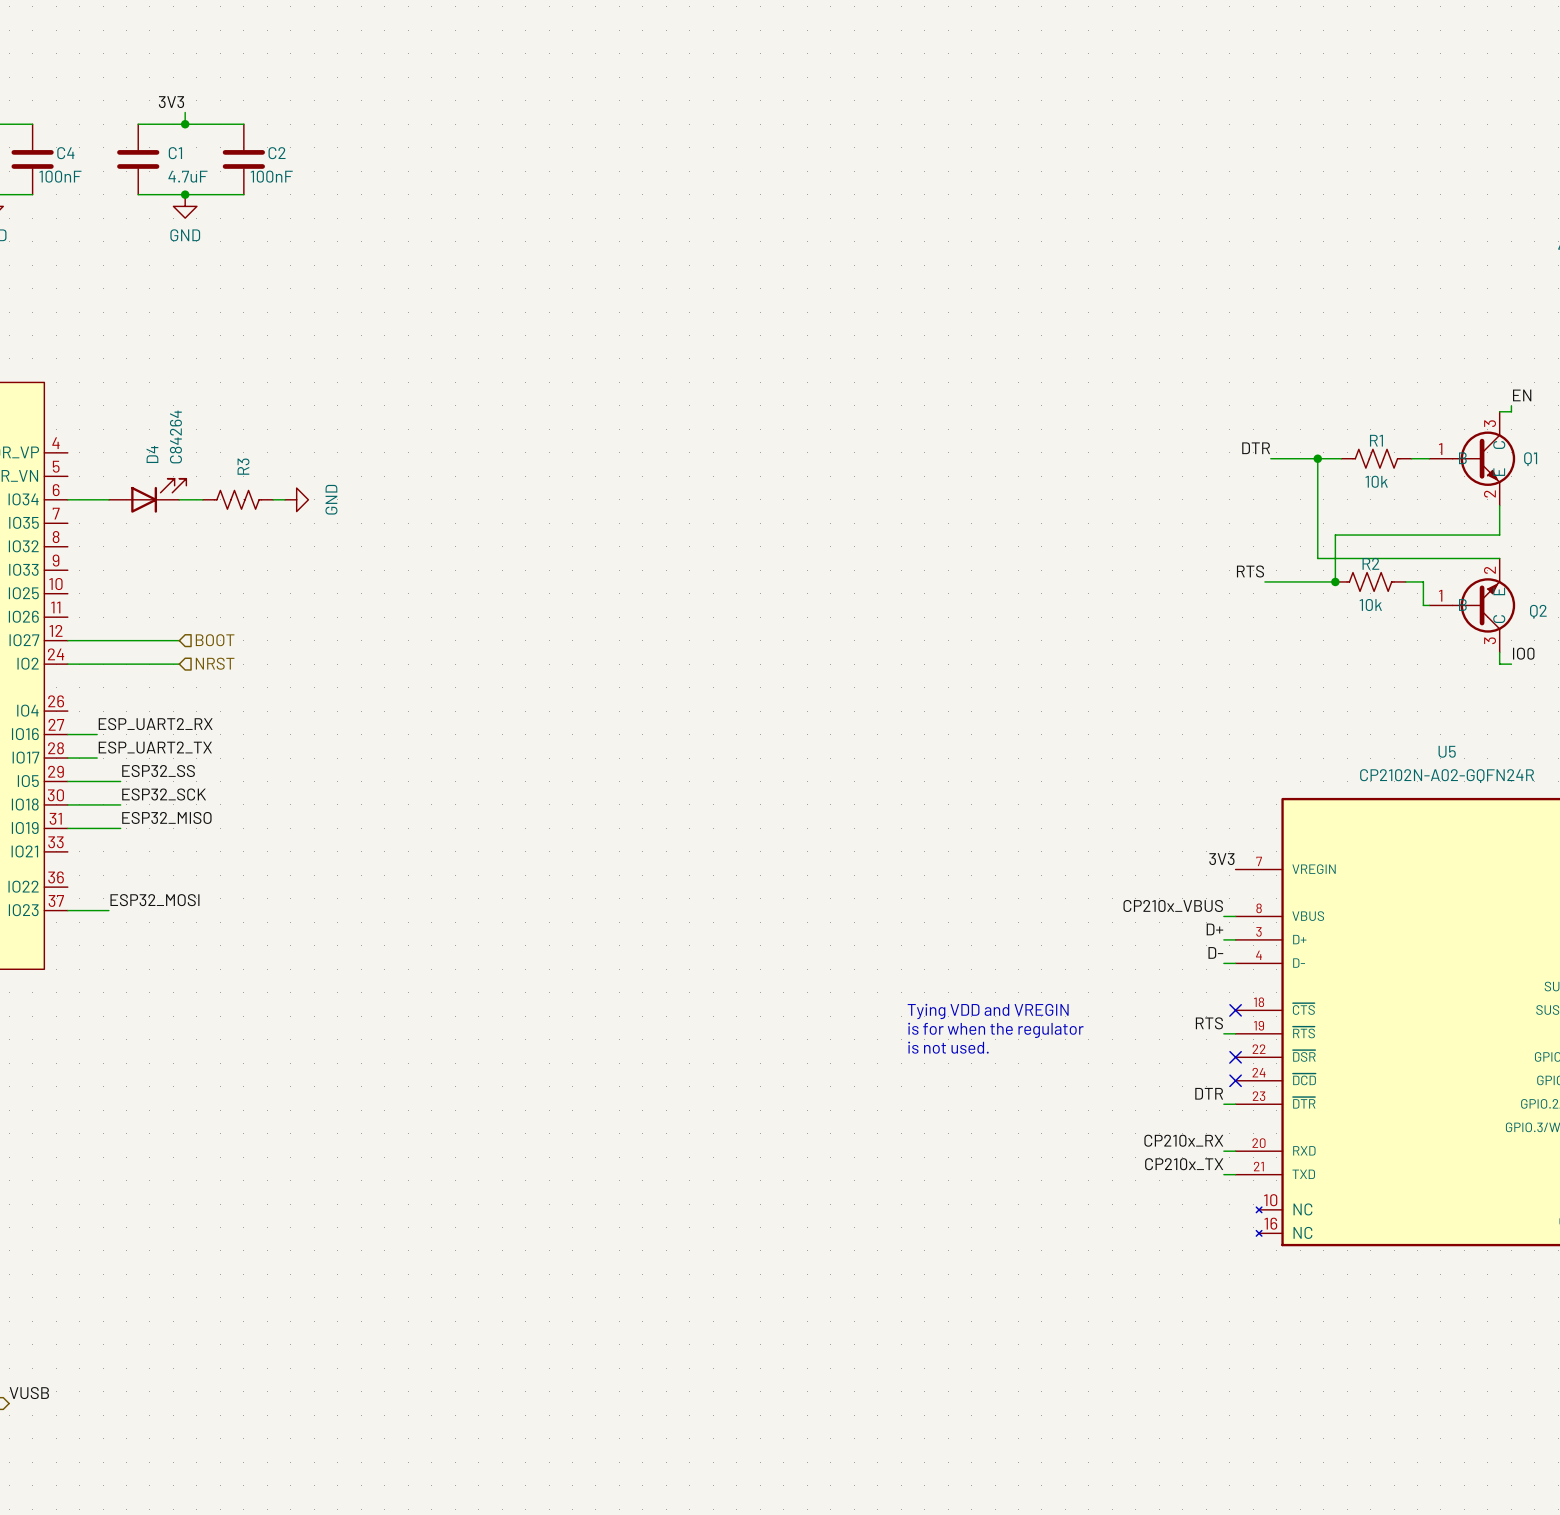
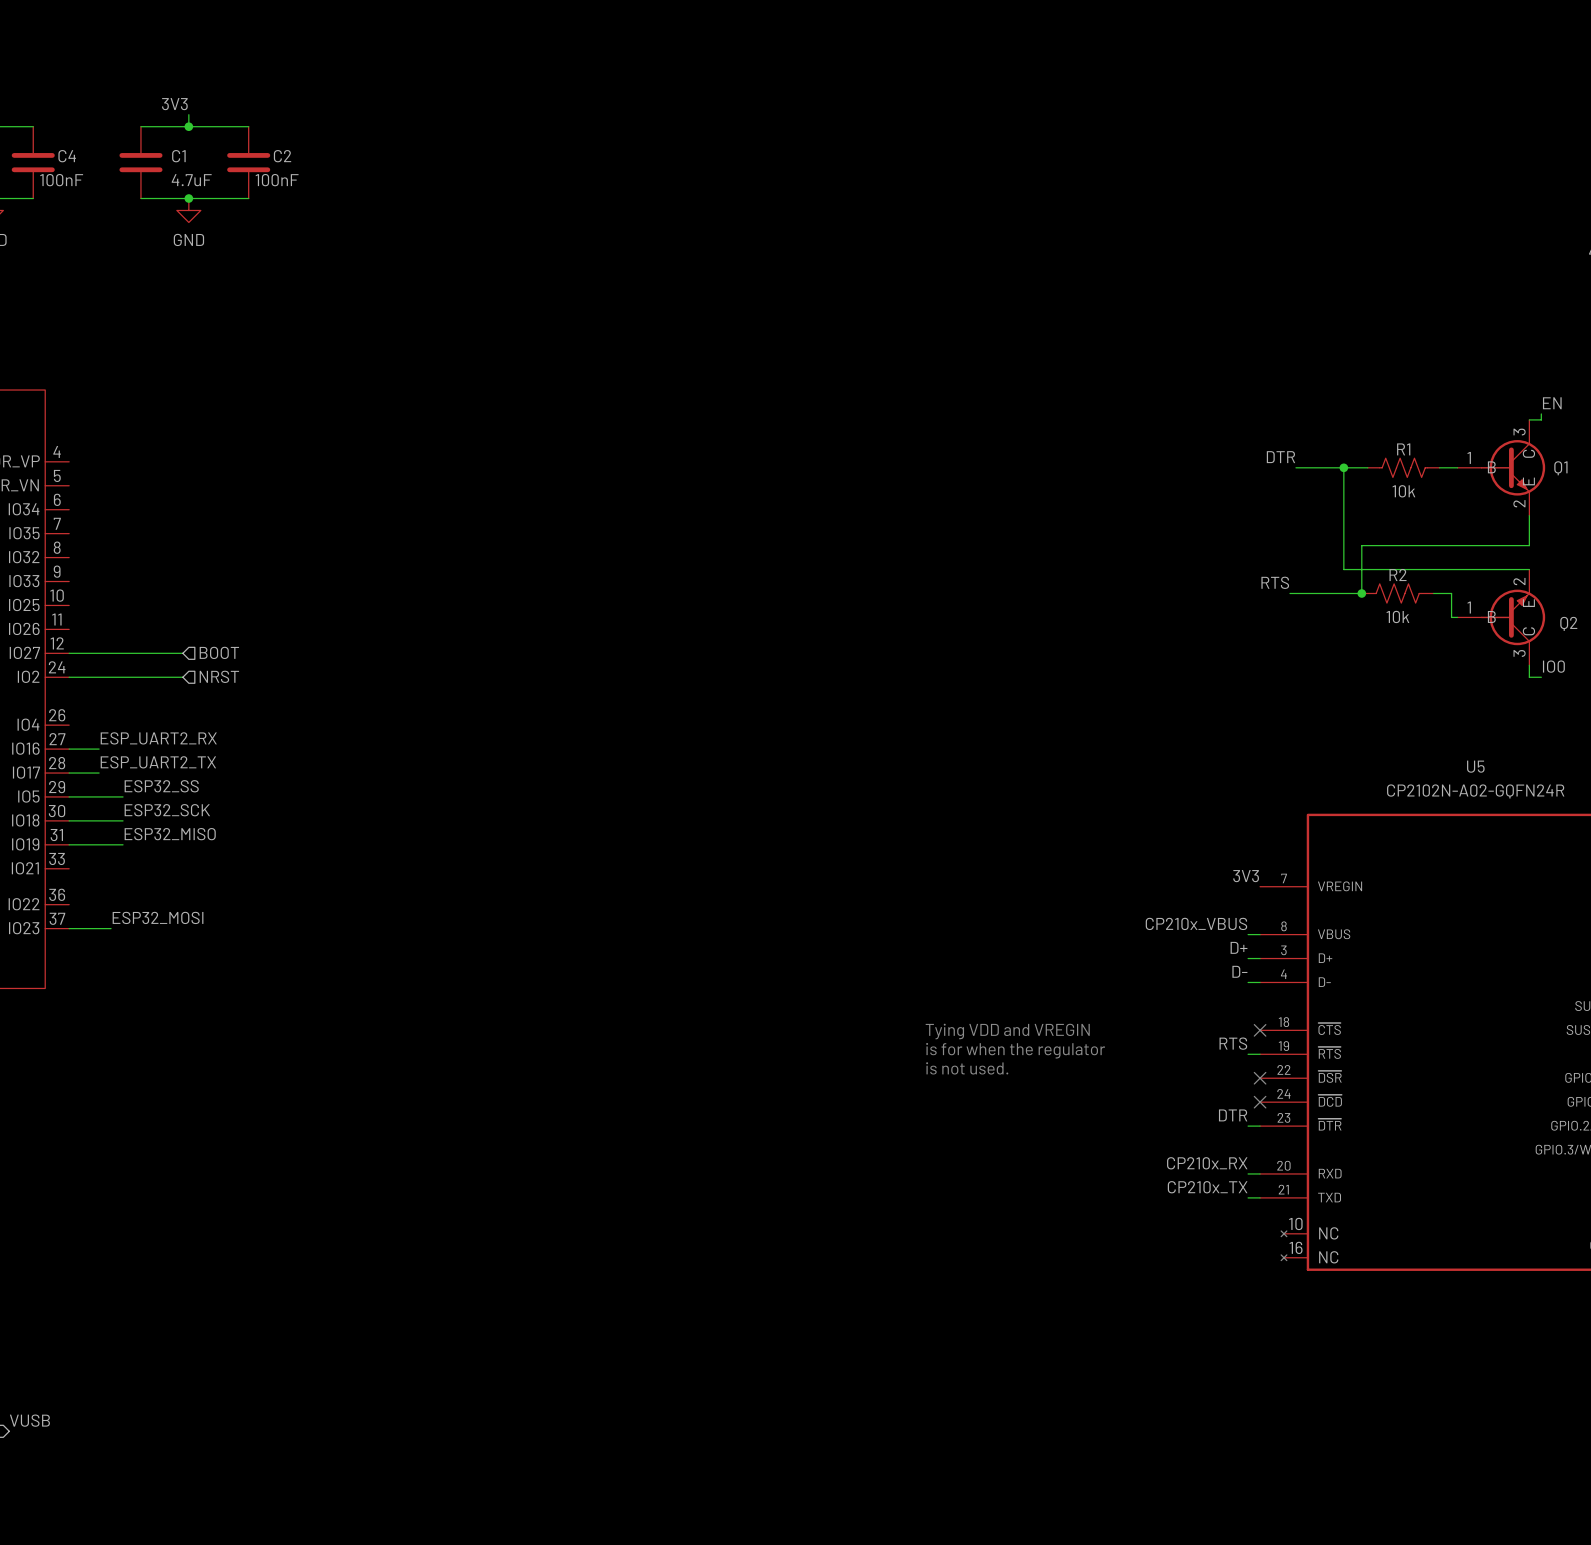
D4: C84264 (147, 495) -> none
wire: (67, 499) (108, 499) -> none
wire: (179, 499) (202, 499) -> none
R3: (237, 499) -> none
wire: (273, 499) (284, 499) -> none
power symbol: GND (296, 499) -> none

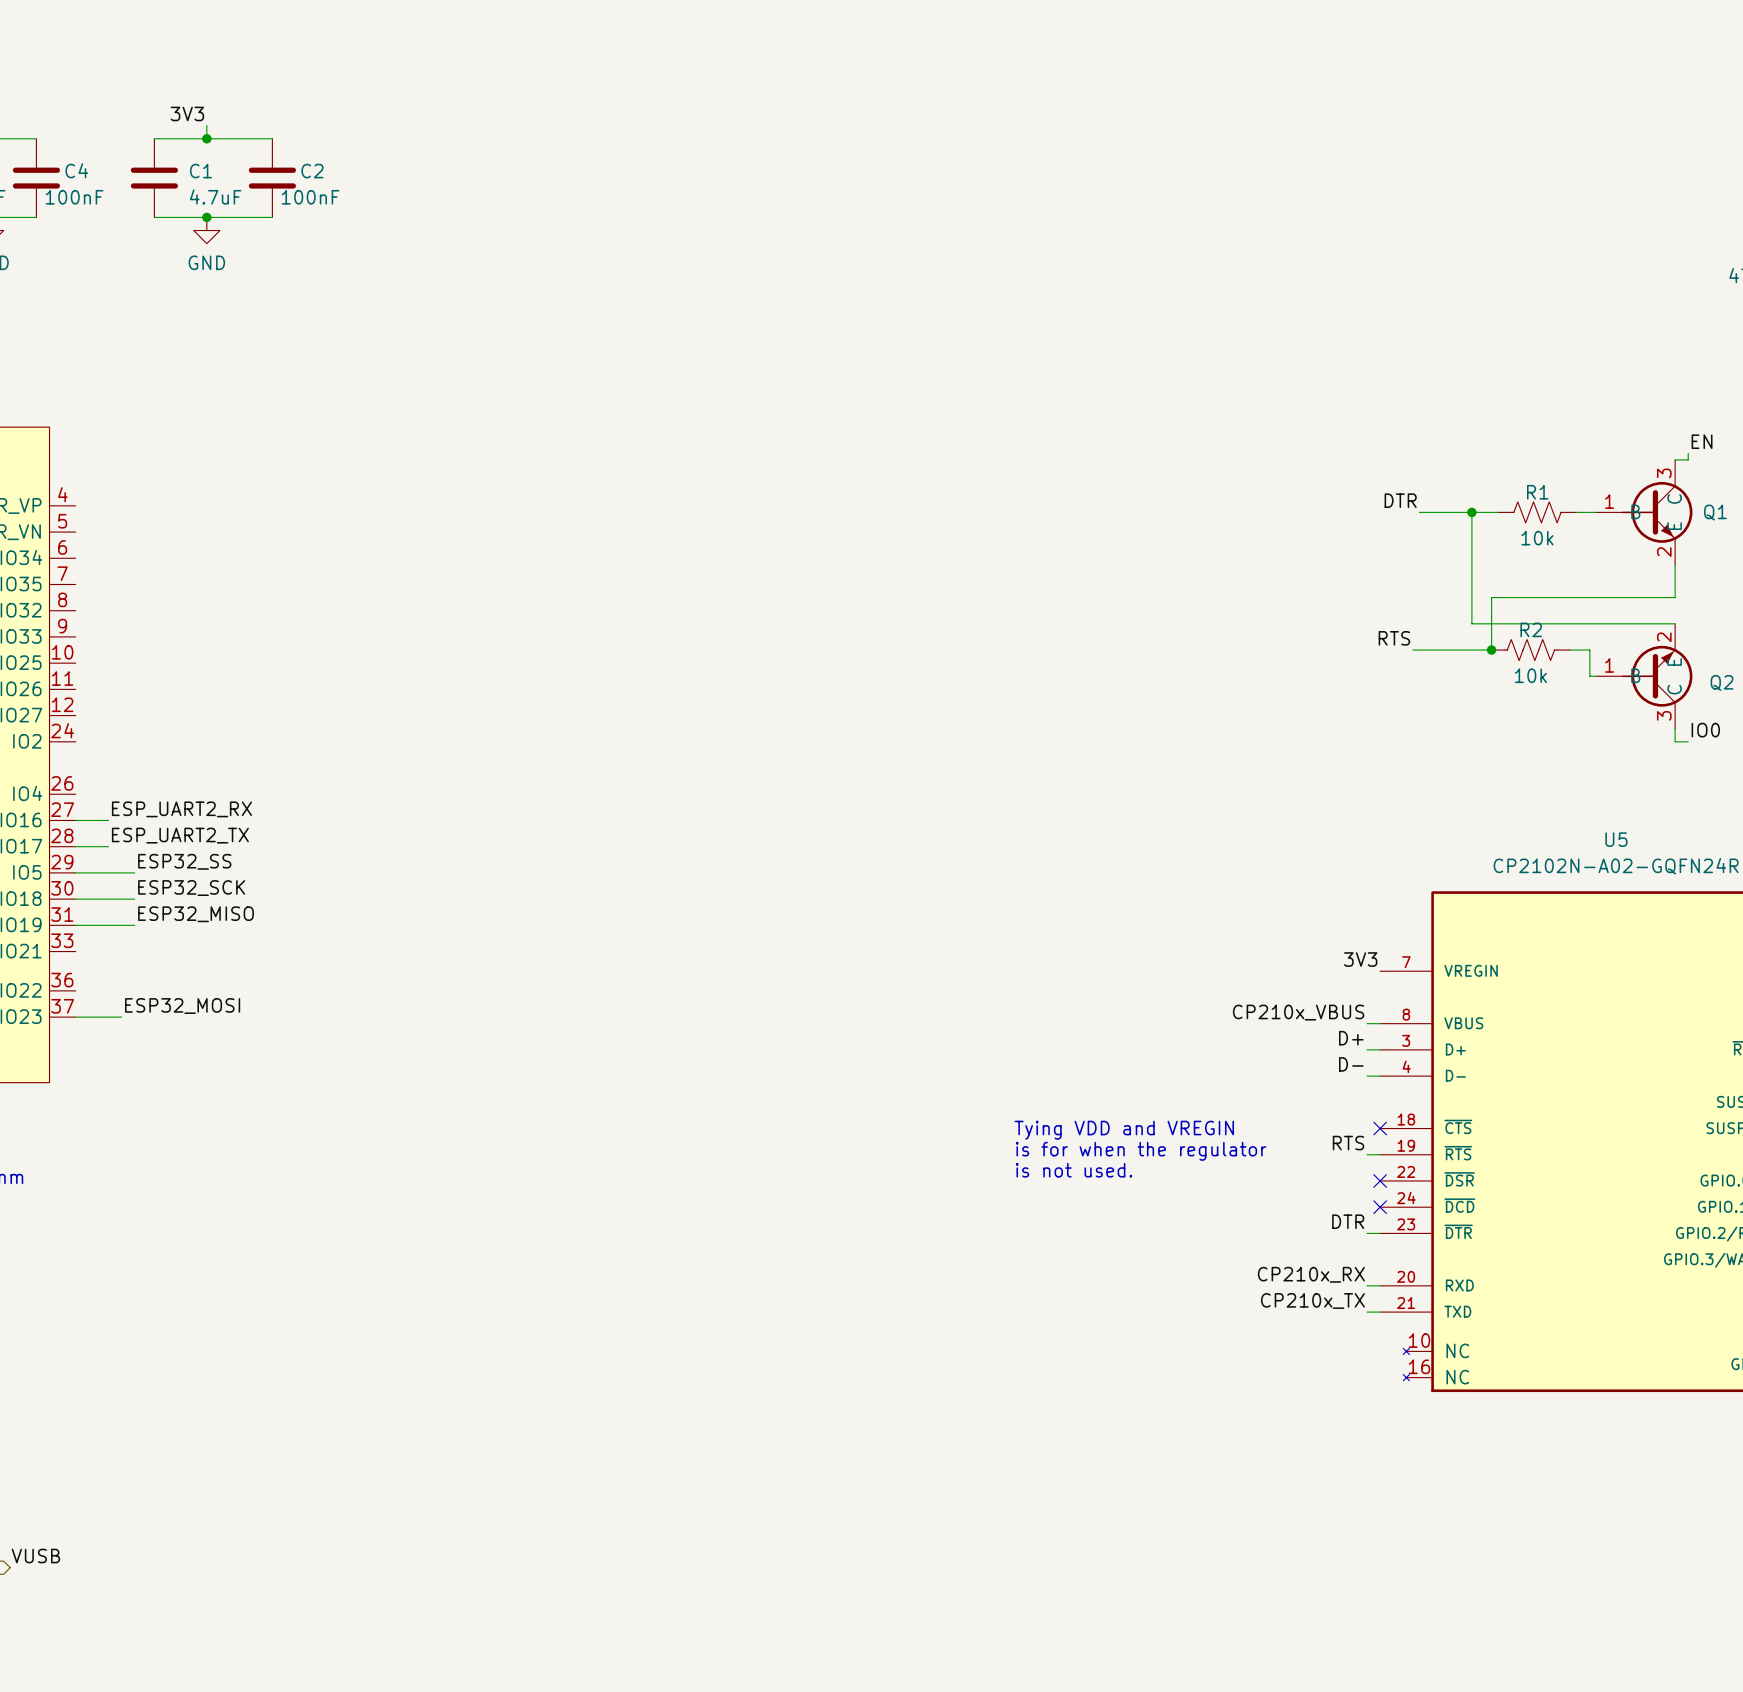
hierarchical label: BOOT (219, 652) -> none
wire: (69, 653) (182, 653) -> none
hierarchical label: NRST (219, 676) -> none
wire: (69, 677) (182, 677) -> none

